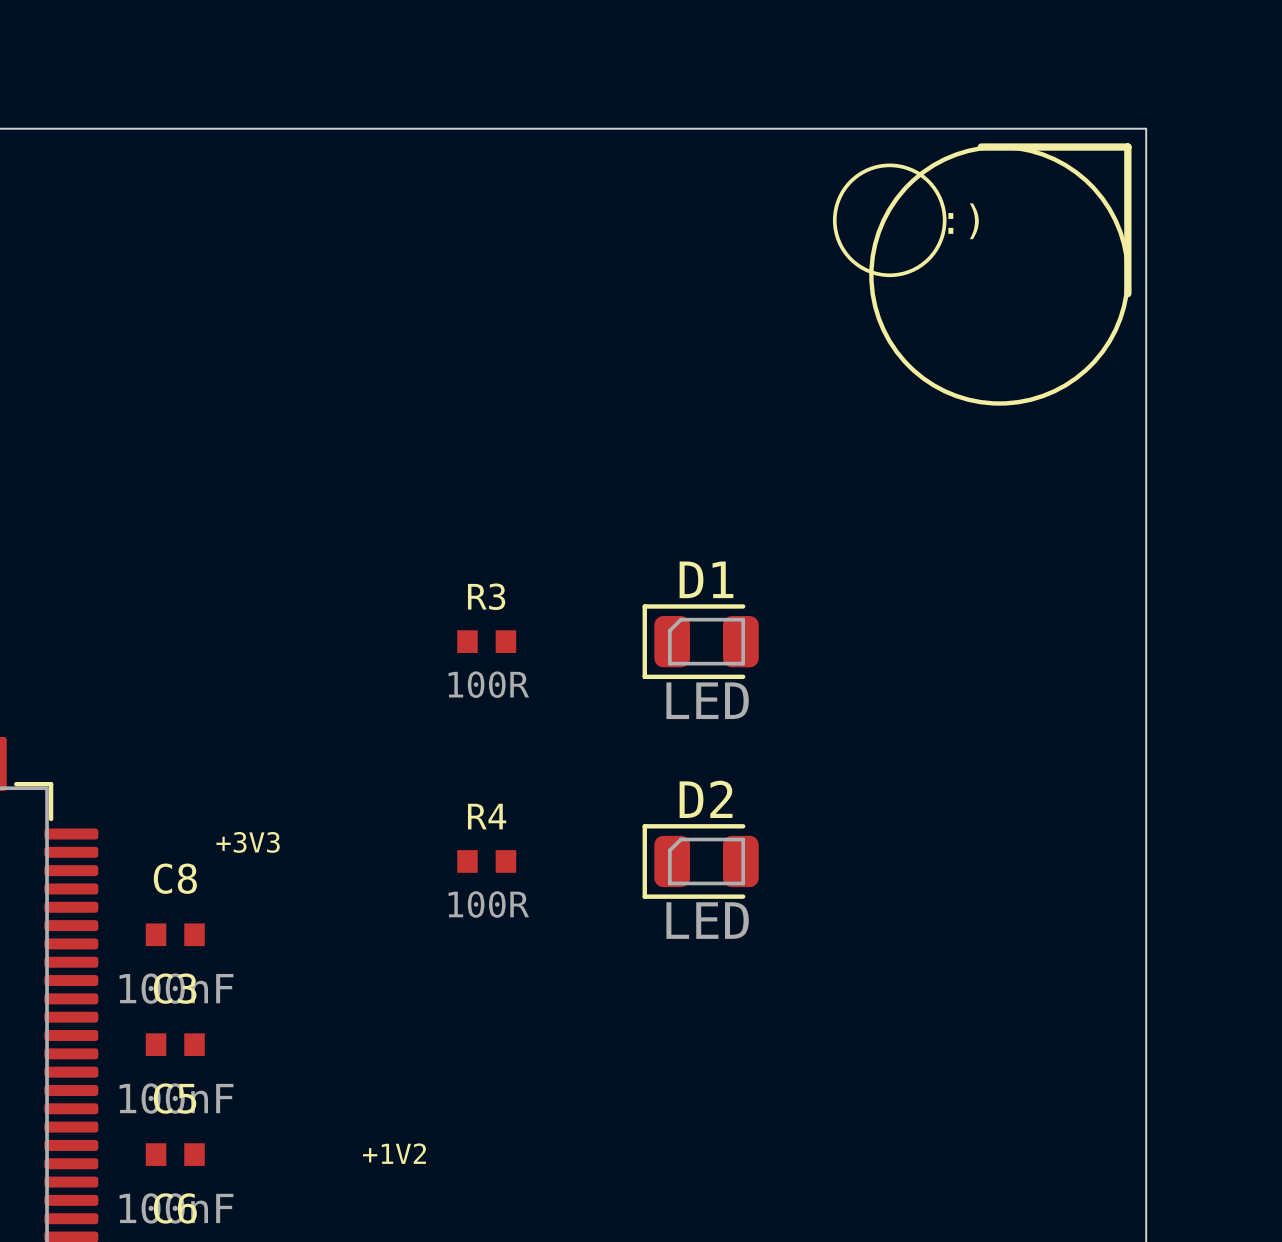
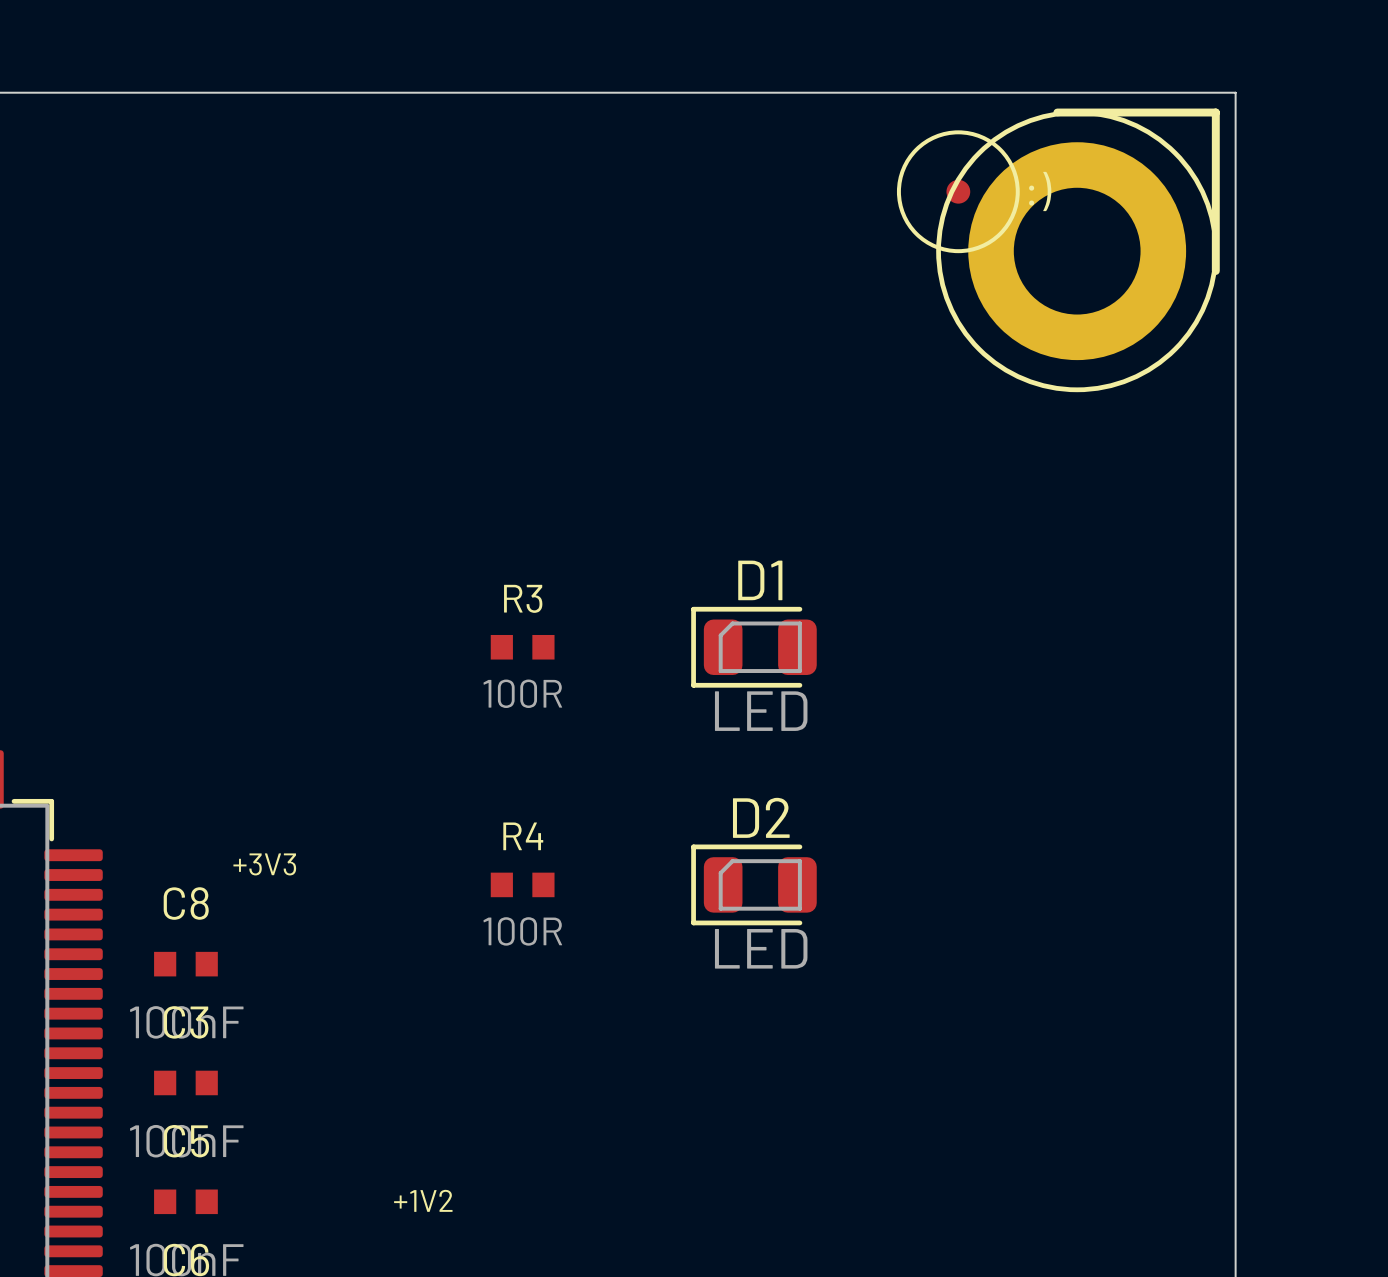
part: none -> (958, 191)
part: none -> (1077, 251)

